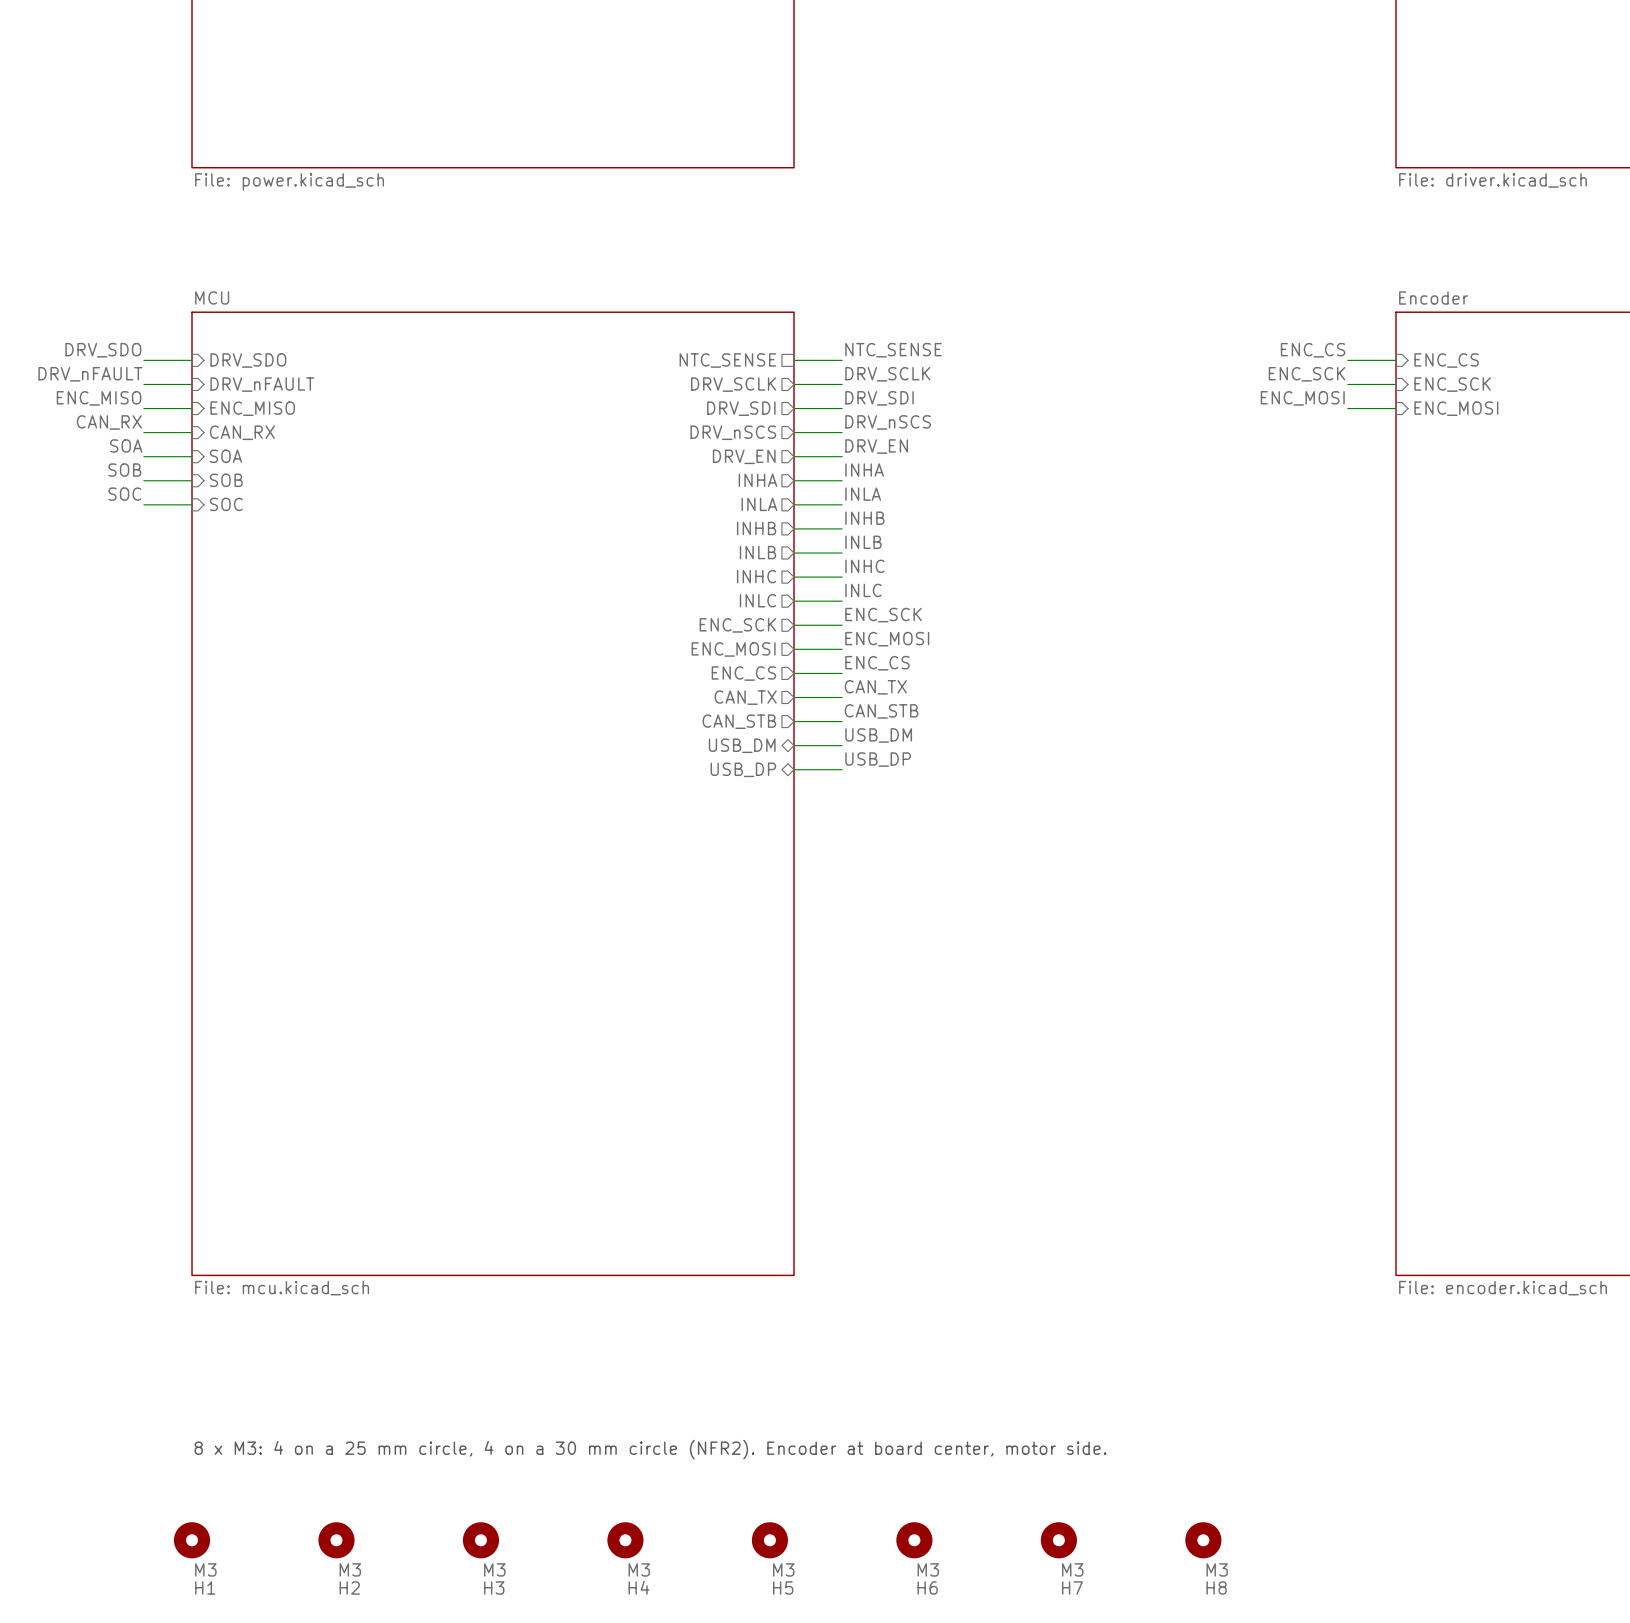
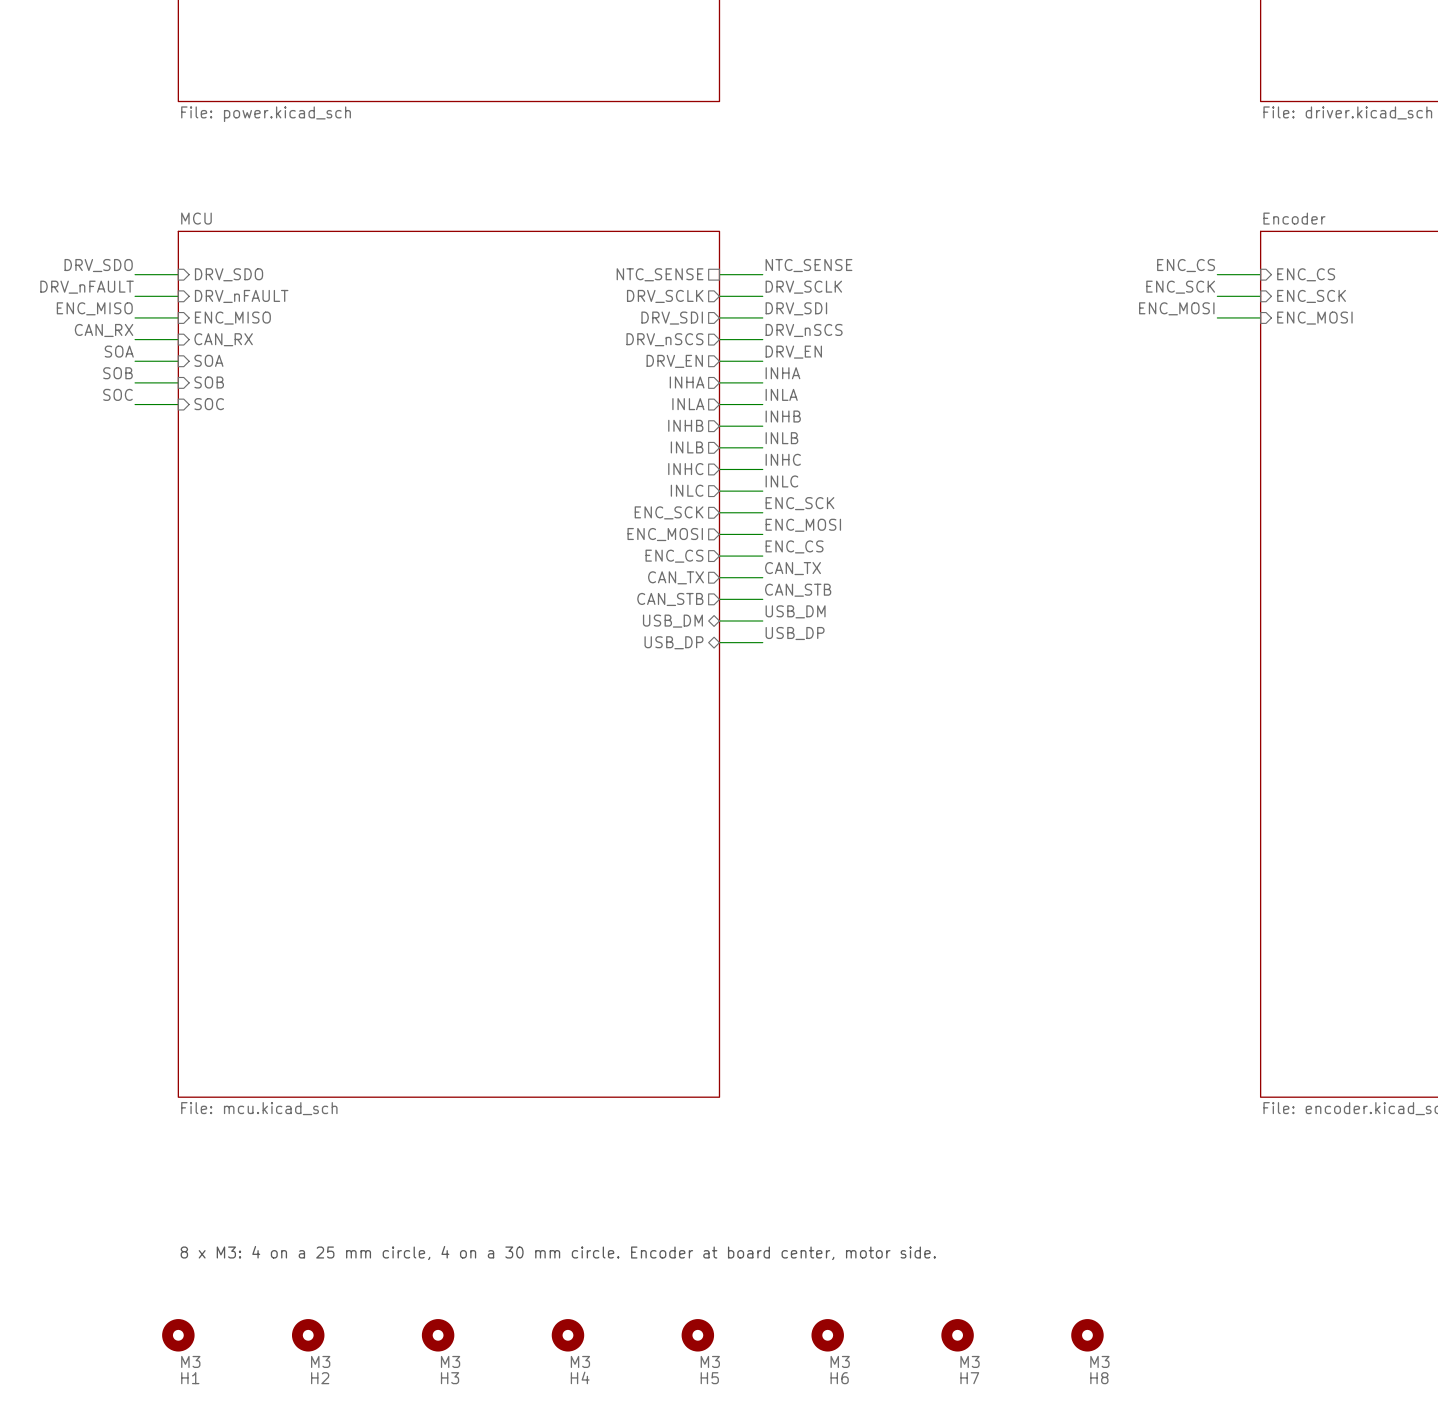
text: 8 x M3: 4 on a 25 mm circle, 4 on a 30 mm circle (NFR2). Encoder at board center, motor side. (650, 1449) -> 8 x M3: 4 on a 25 mm circle, 4 on a 30 mm circle. Encoder at board center, motor side. (558, 1253)

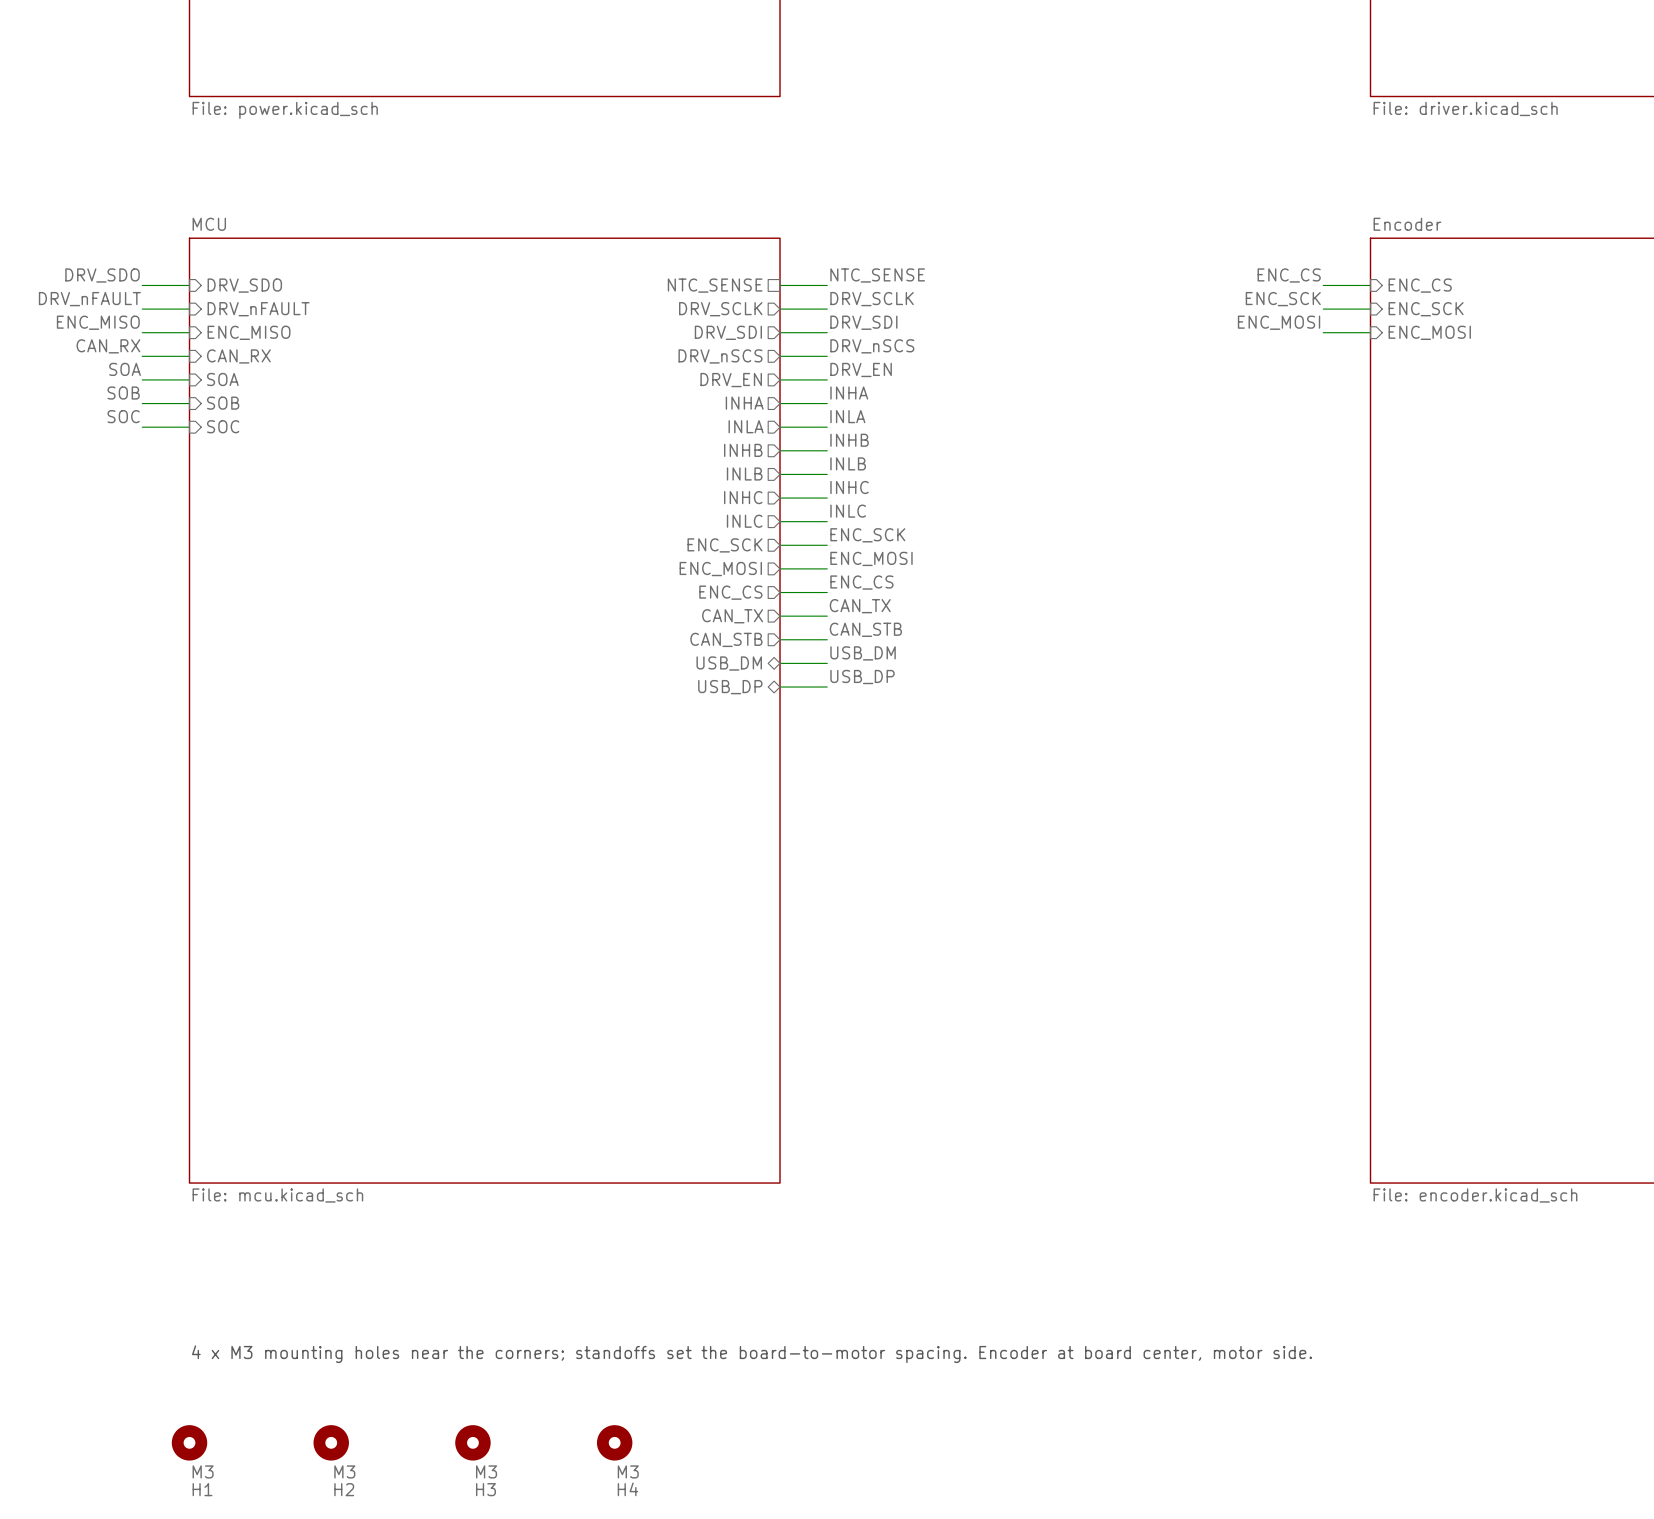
text: 8 x M3: 4 on a 25 mm circle, 4 on a 30 mm circle. Encoder at board center, motor side. (558, 1253) -> 4 x M3 mounting holes near the corners; standoffs set the board-to-motor spacing. Encoder at board center, motor side. (751, 1354)
H5: M3 (697, 1335) -> none
H6: M3 (827, 1335) -> none
H7: M3 (957, 1335) -> none
H8: M3 (1087, 1335) -> none

